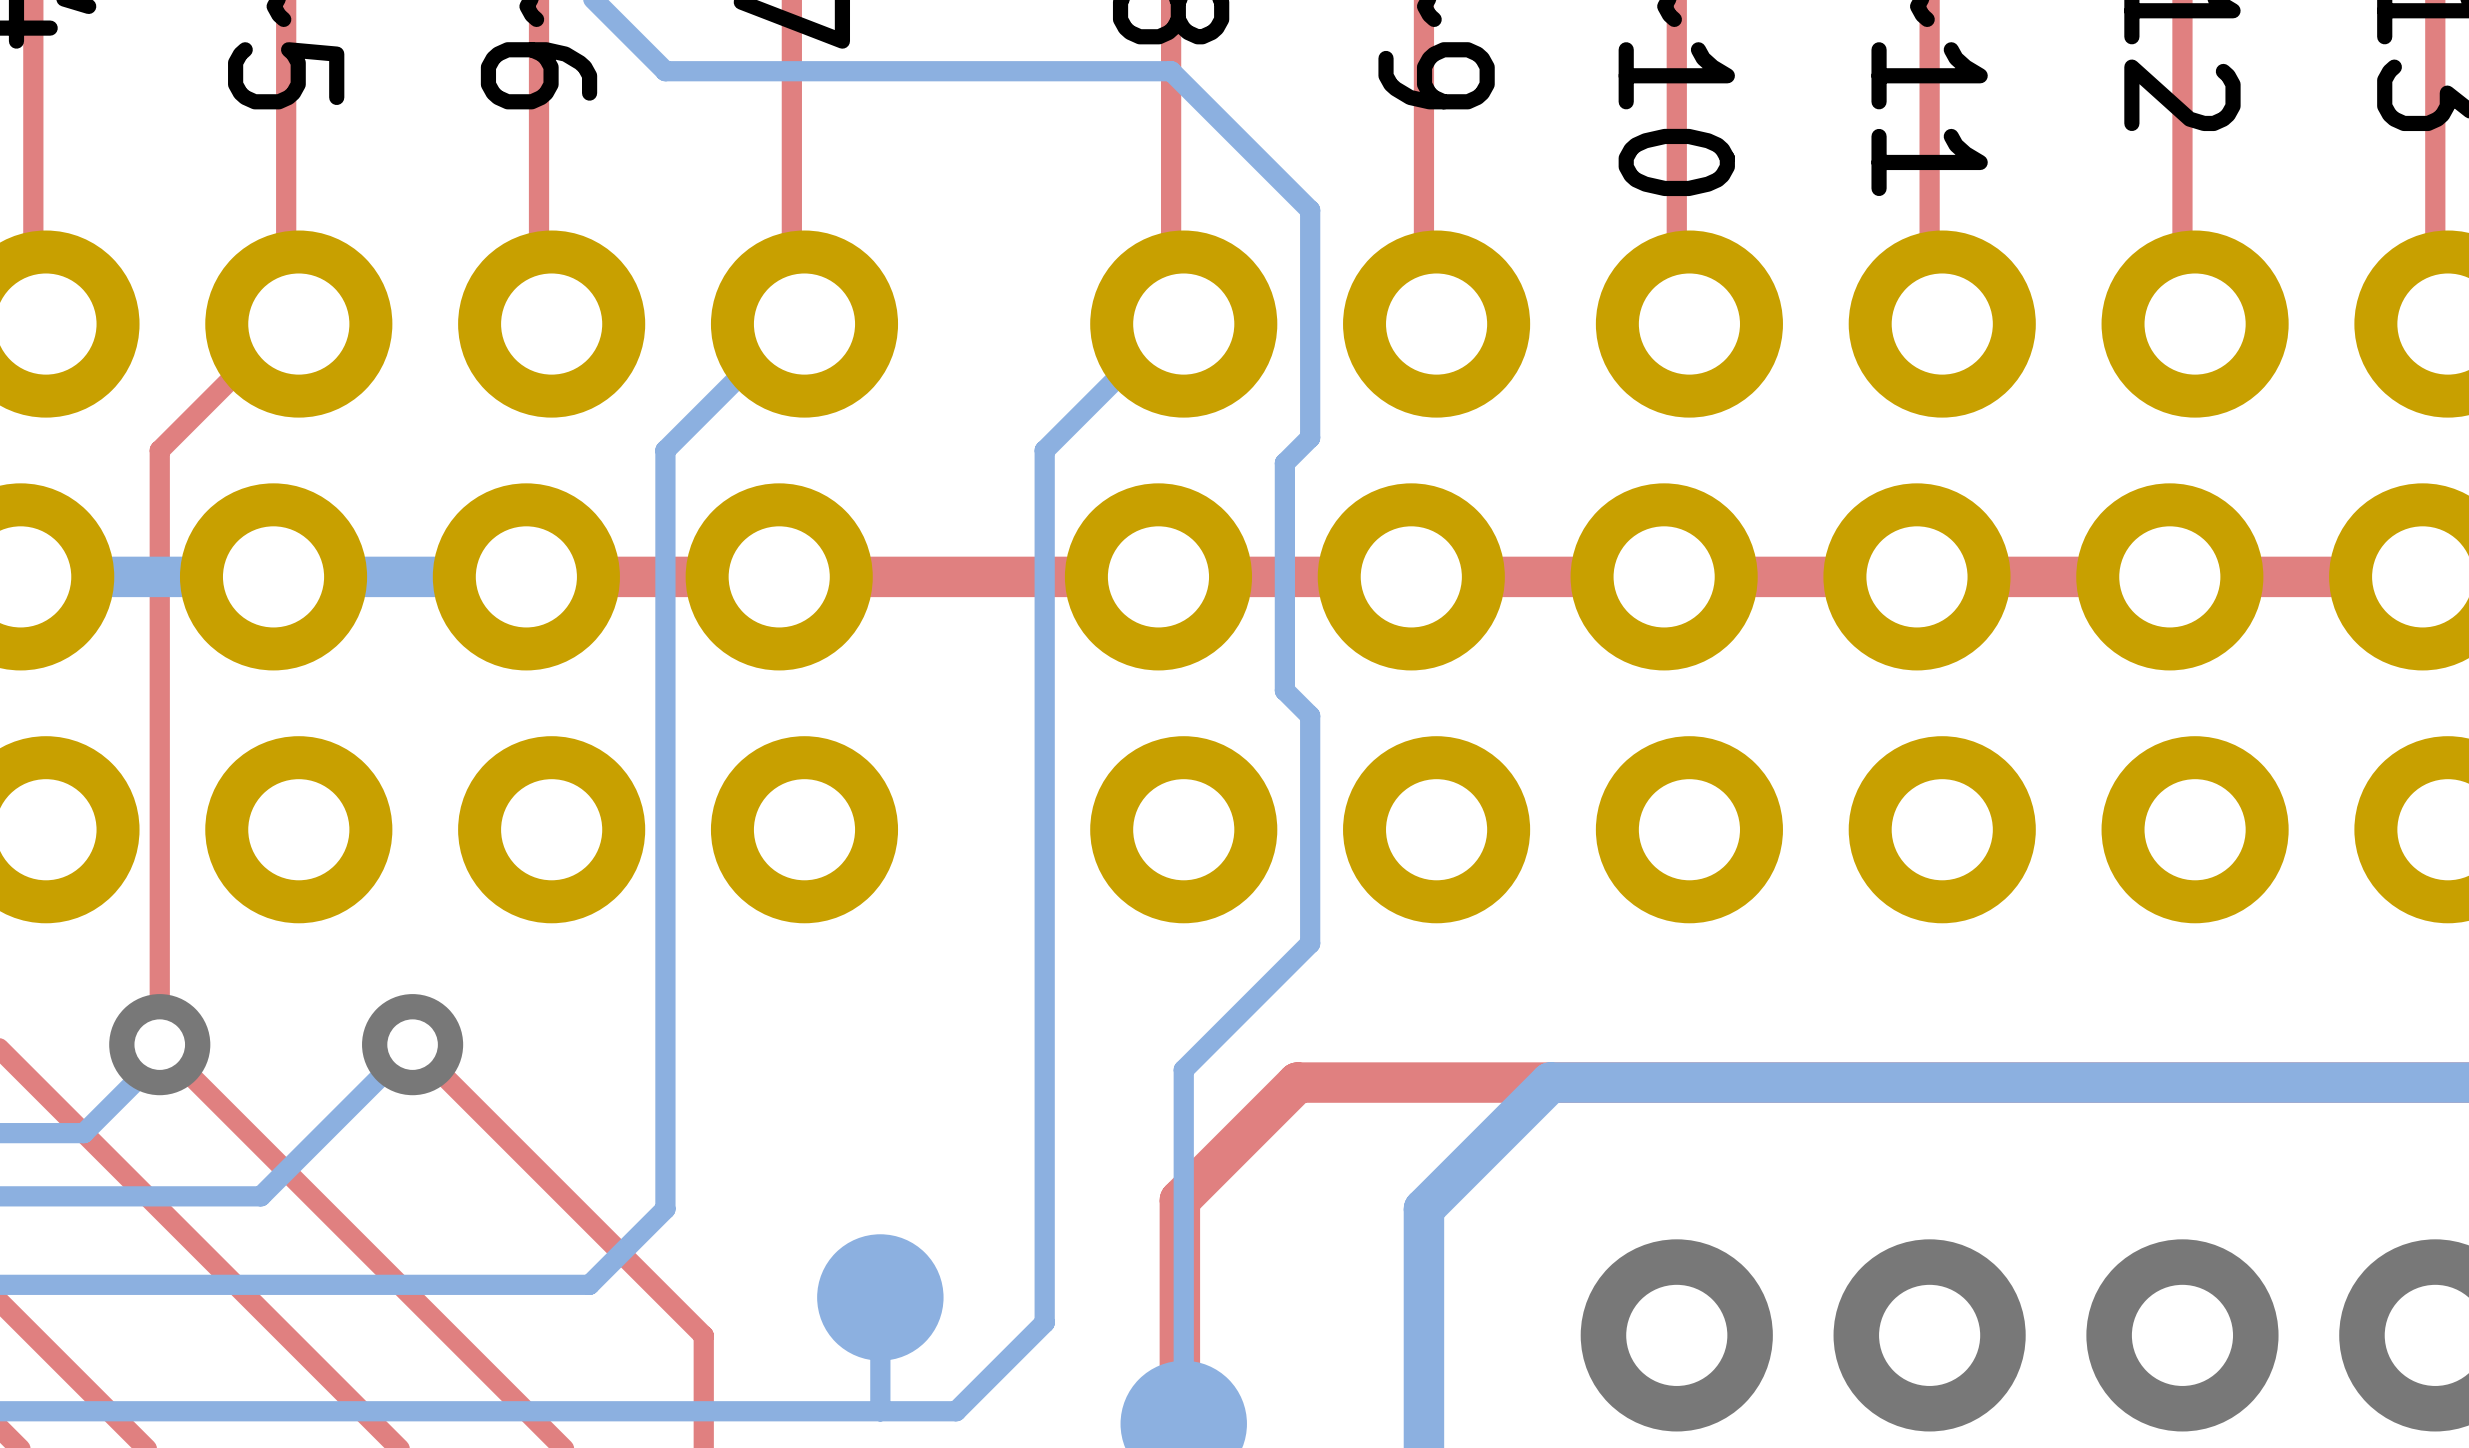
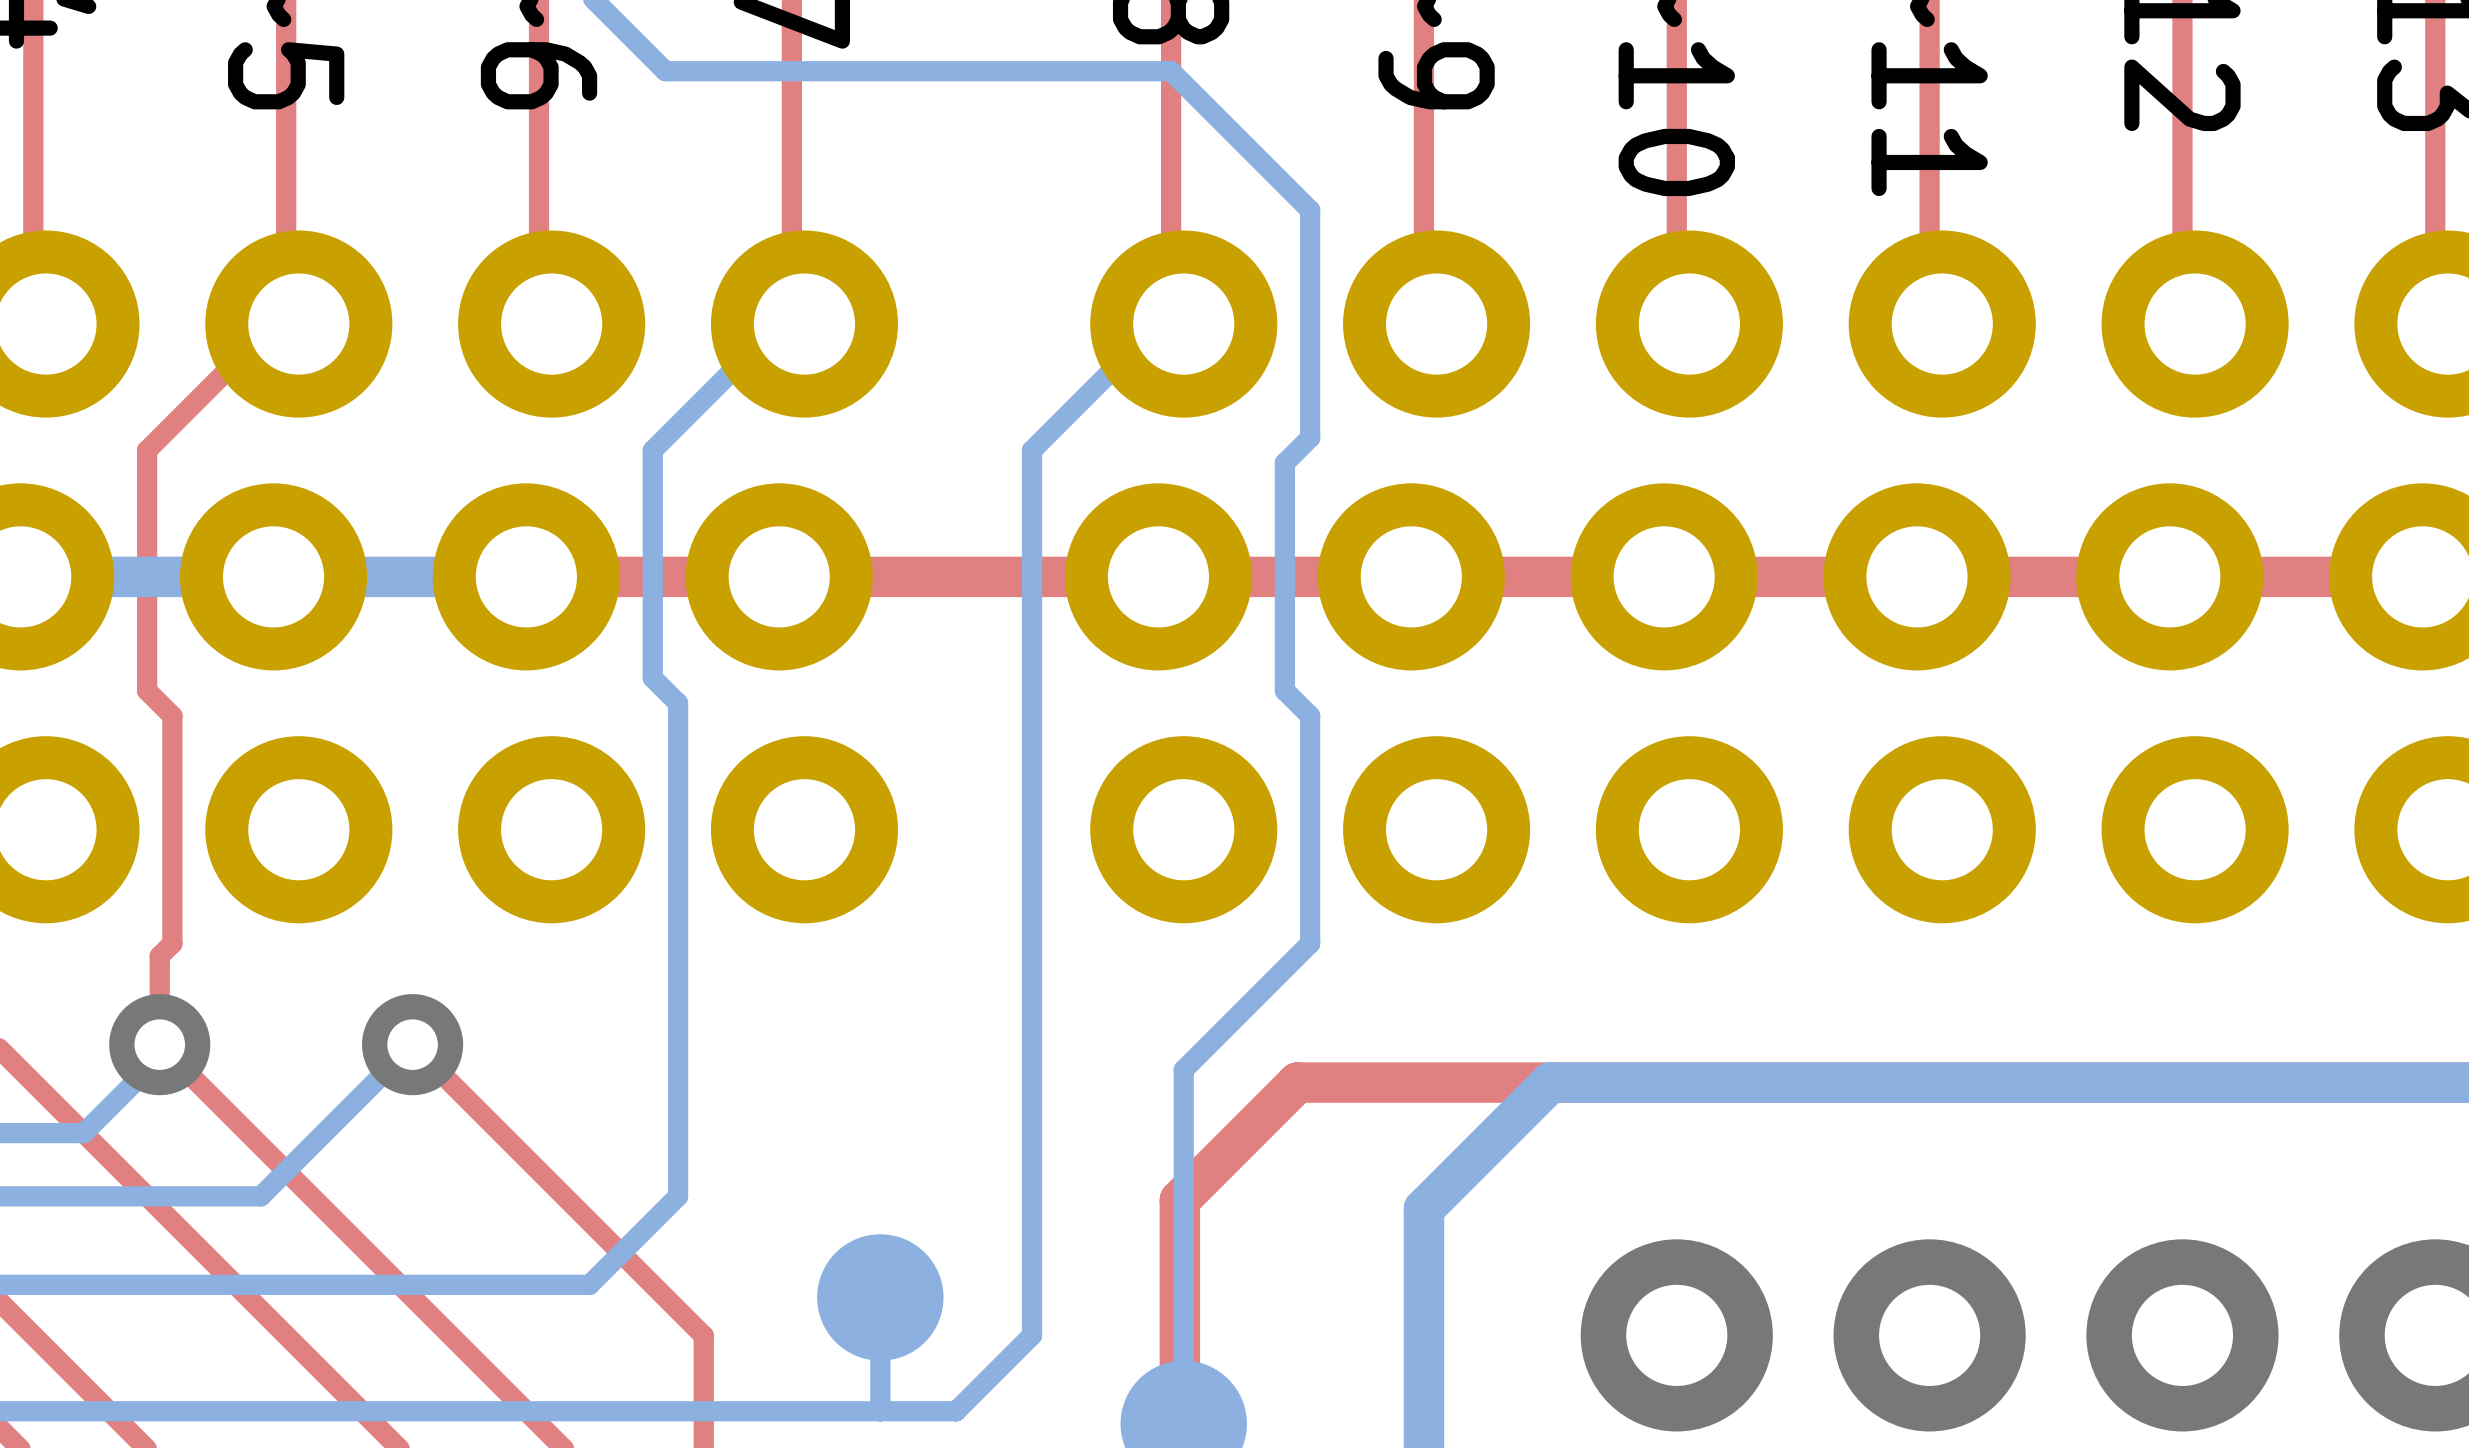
top track: (286, 324) (159, 450) (159, 956) -> (286, 324) (273, 324) (147, 450) (147, 690) (172, 715) (172, 943) (159, 956)
bottom track: (791, 324) (665, 450) (665, 1208) -> (791, 324) (779, 324) (652, 450) (652, 678) (678, 703) (678, 1196) (665, 1208)
bottom track: (1171, 324) (1044, 450) (1044, 1322) (1032, 1335) -> (1171, 324) (1158, 324) (1032, 450) (1032, 1335)

